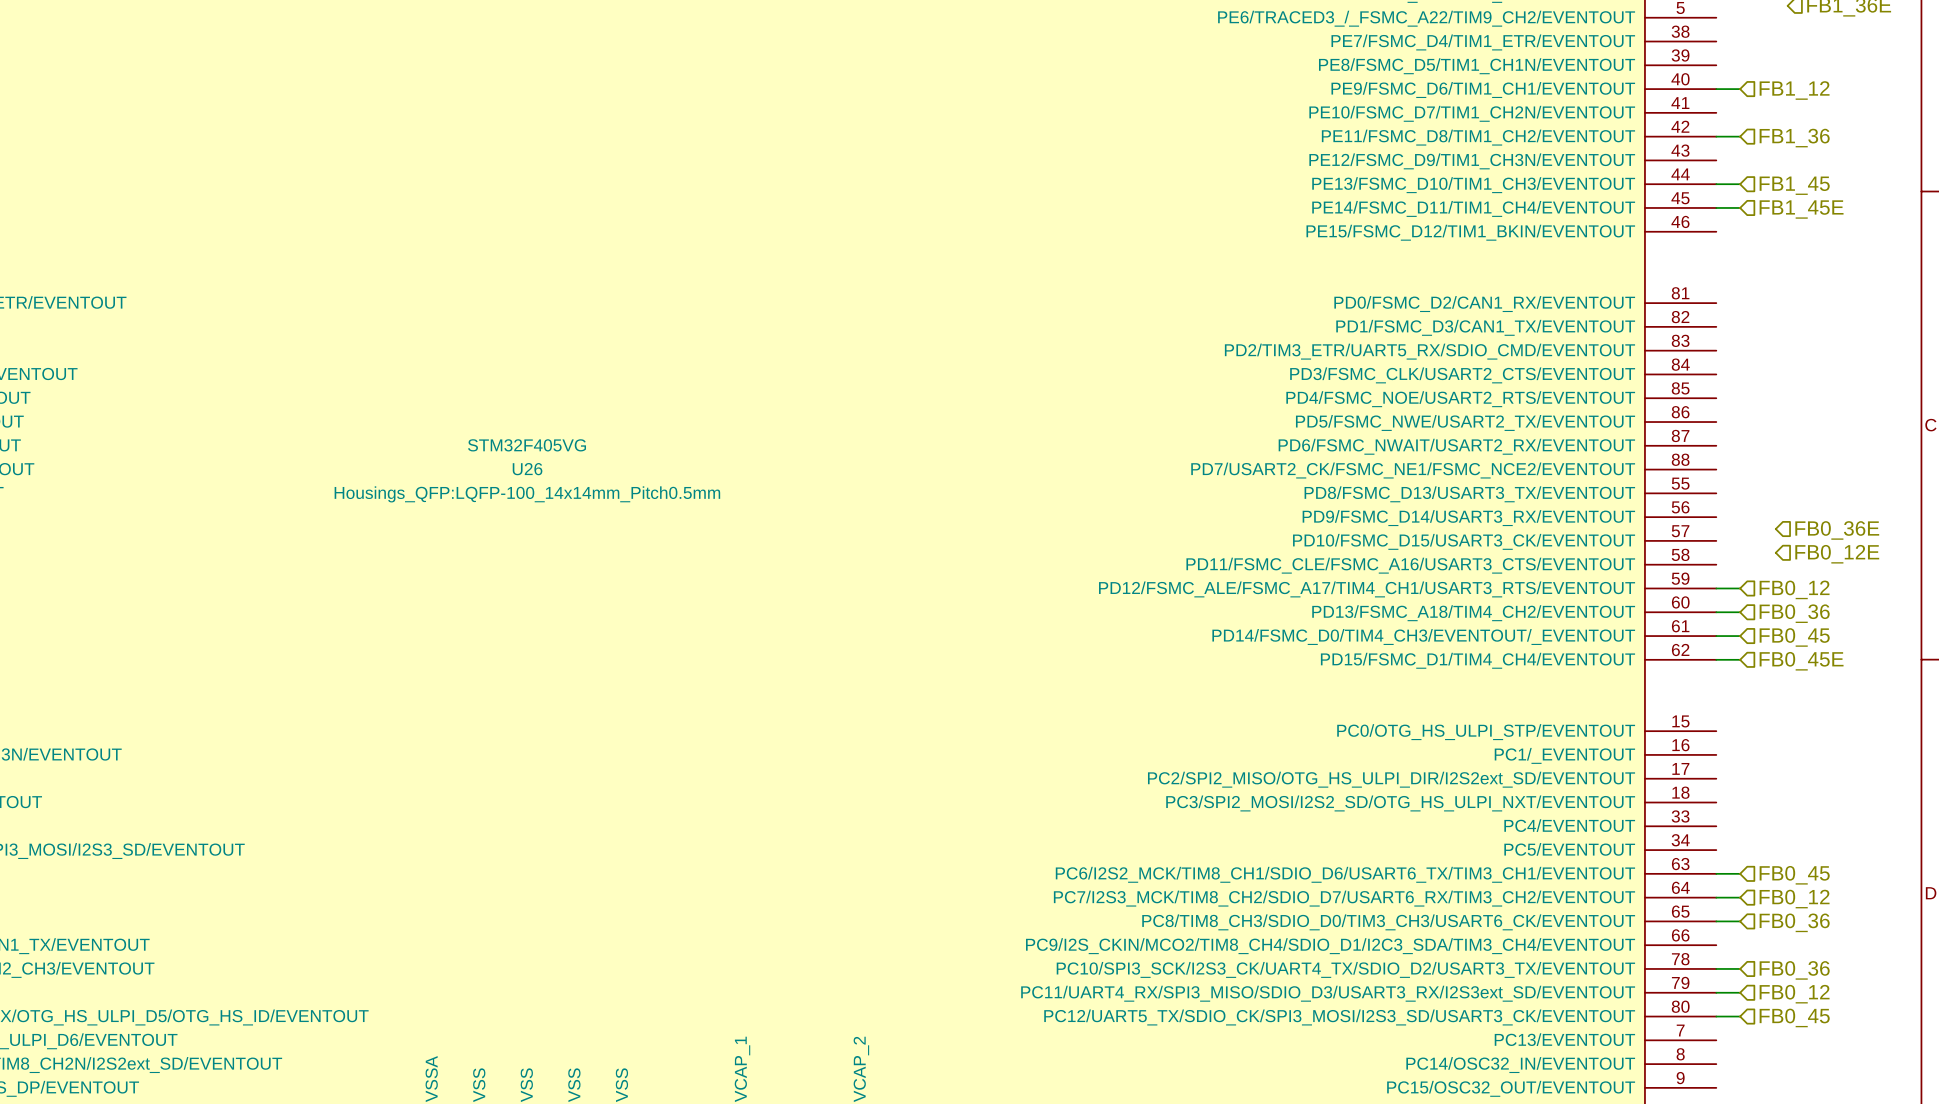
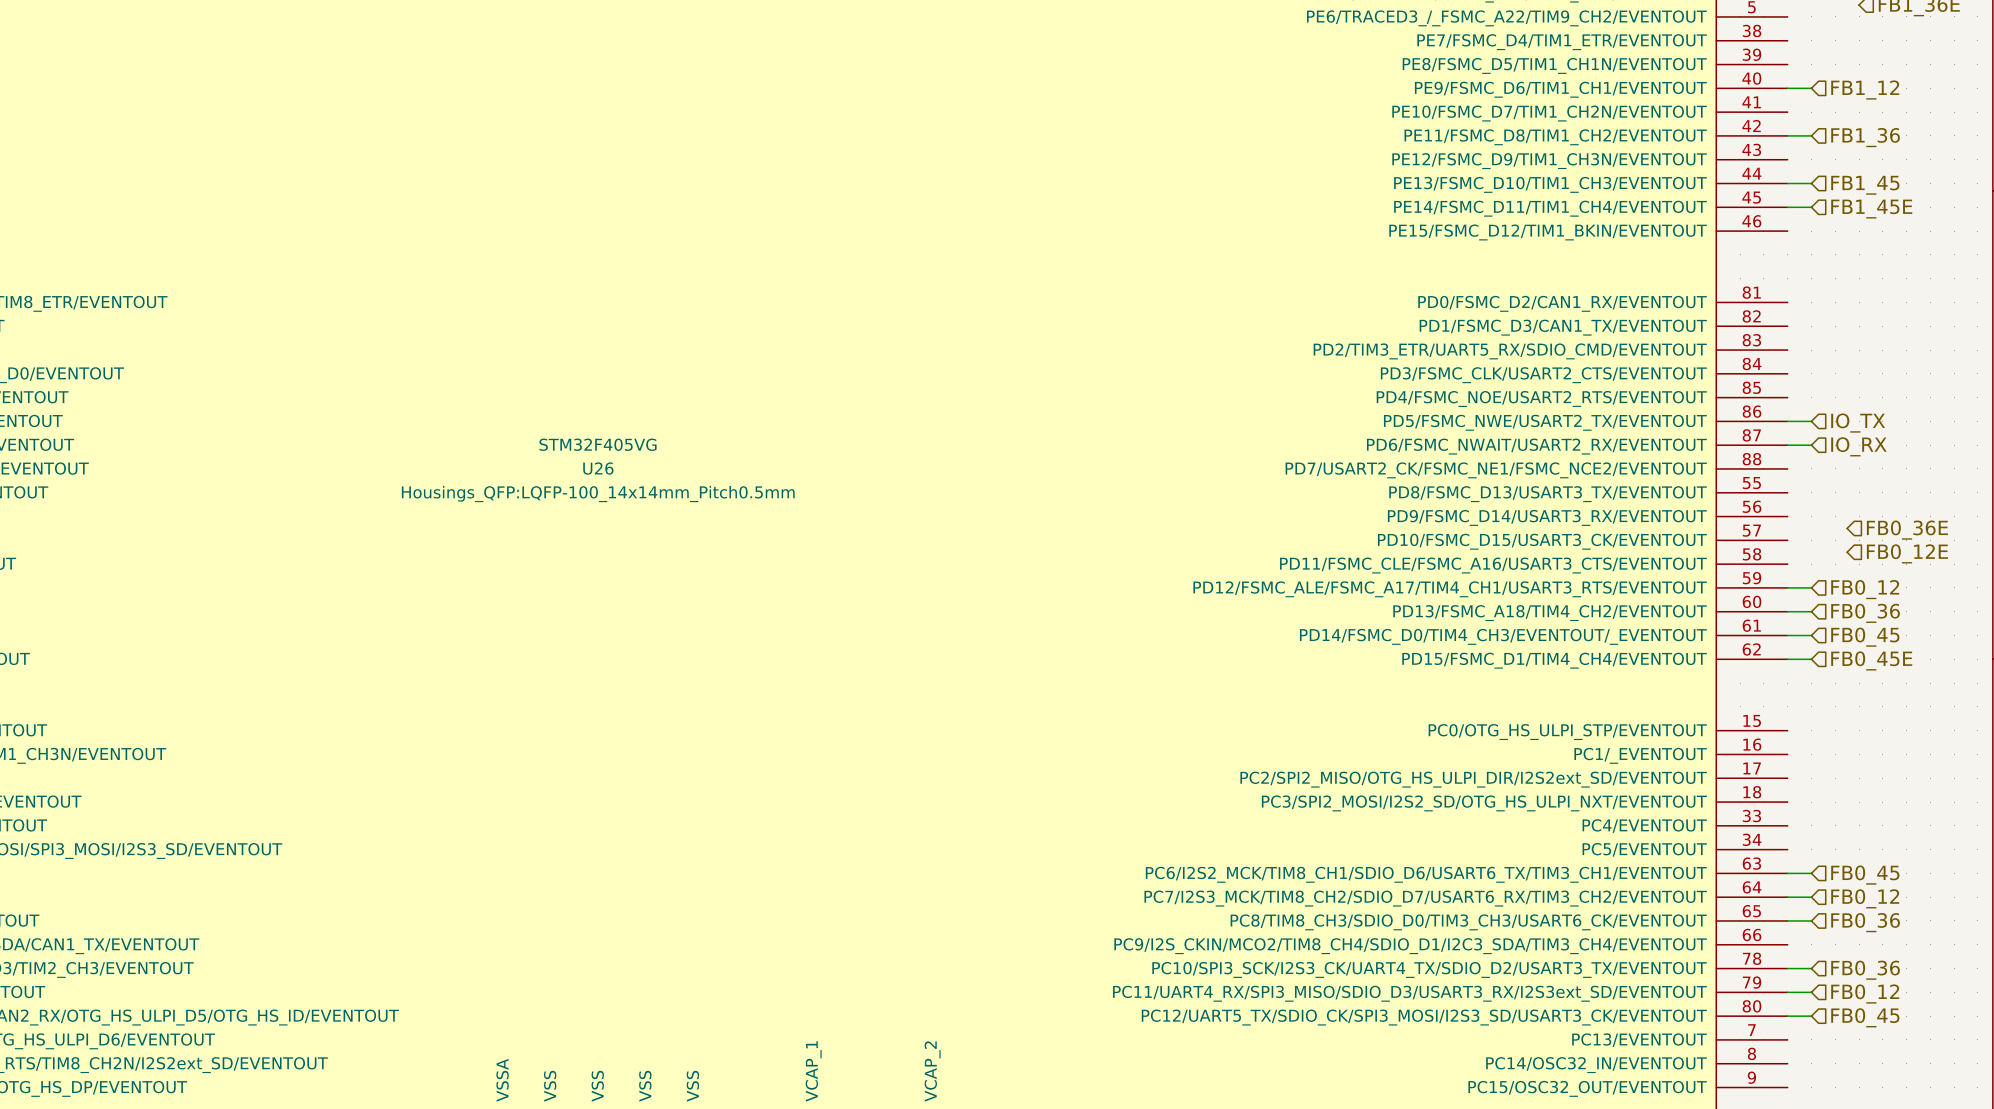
wire: none -> (1787, 421) (1811, 421)
hierarchical label: none -> IO_TX (1858, 423)
wire: none -> (1787, 445) (1811, 445)
hierarchical label: none -> IO_RX (1858, 446)

